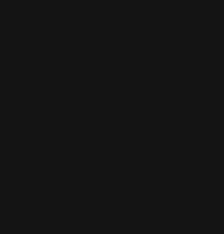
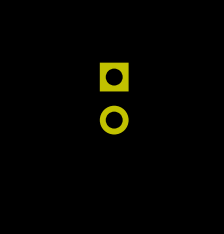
part: none -> (114, 98)

